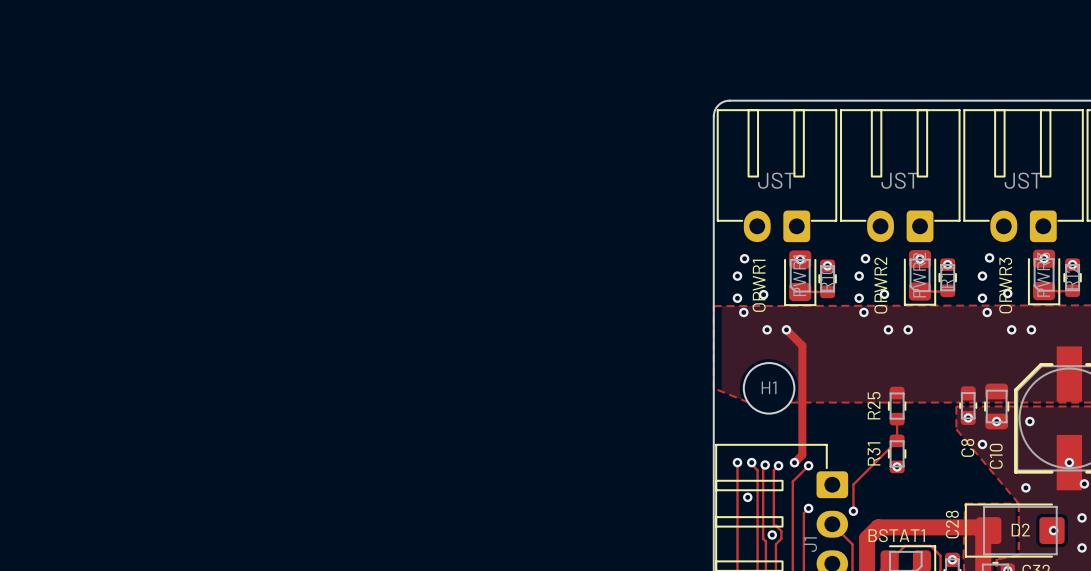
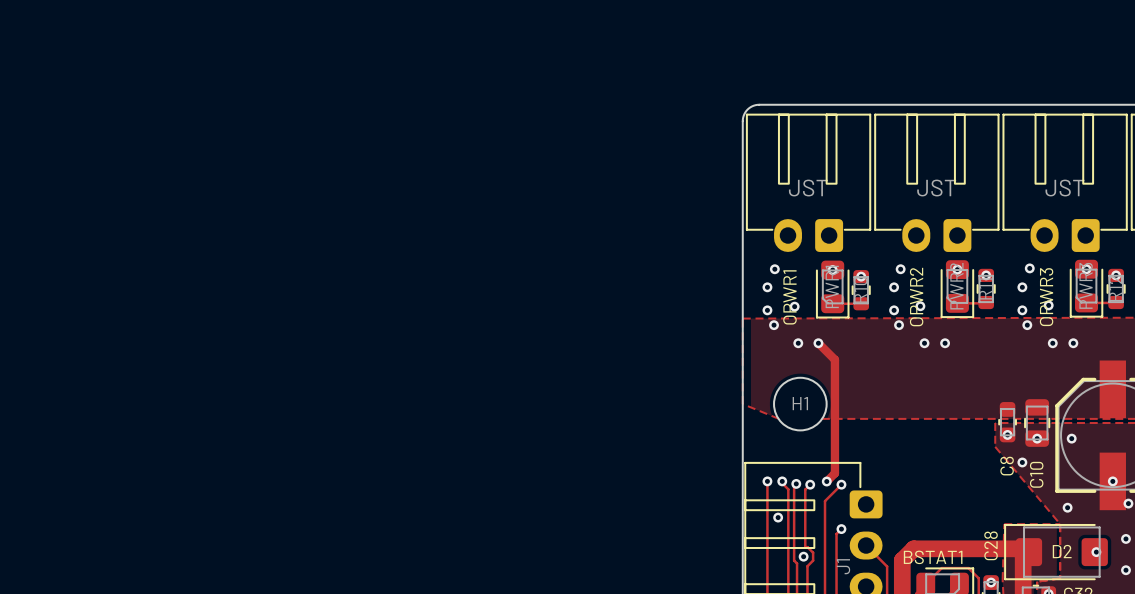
R25: (897, 406) -> none
track: (897, 419) (897, 440) (853, 484) (853, 511) -> none
R31: (897, 453) -> none
via: (897, 466) -> none
via: (853, 511) -> none

